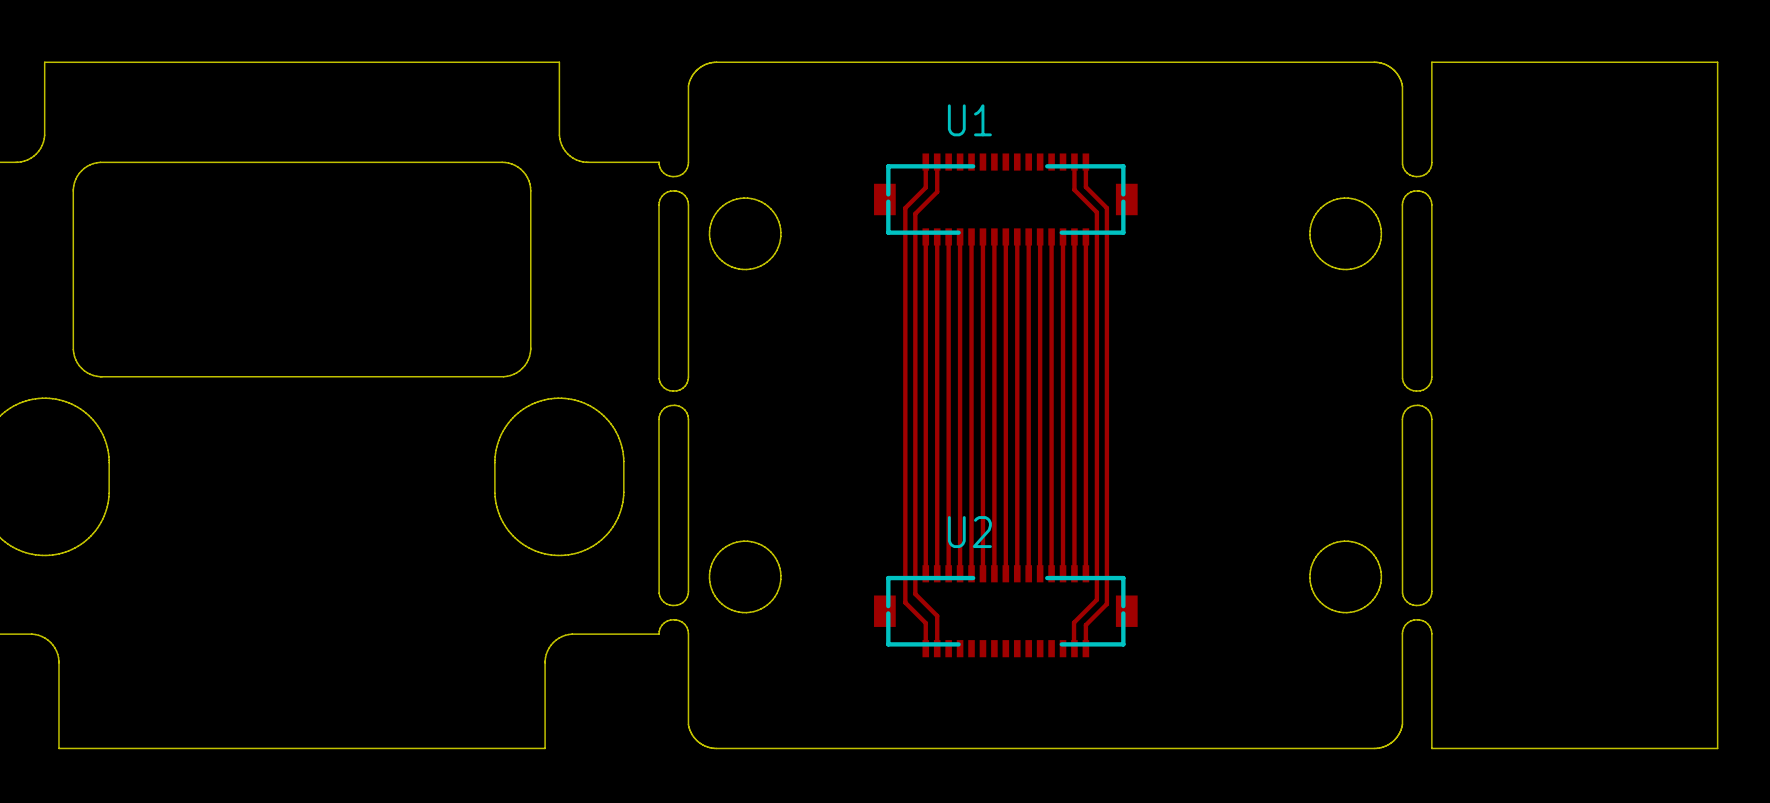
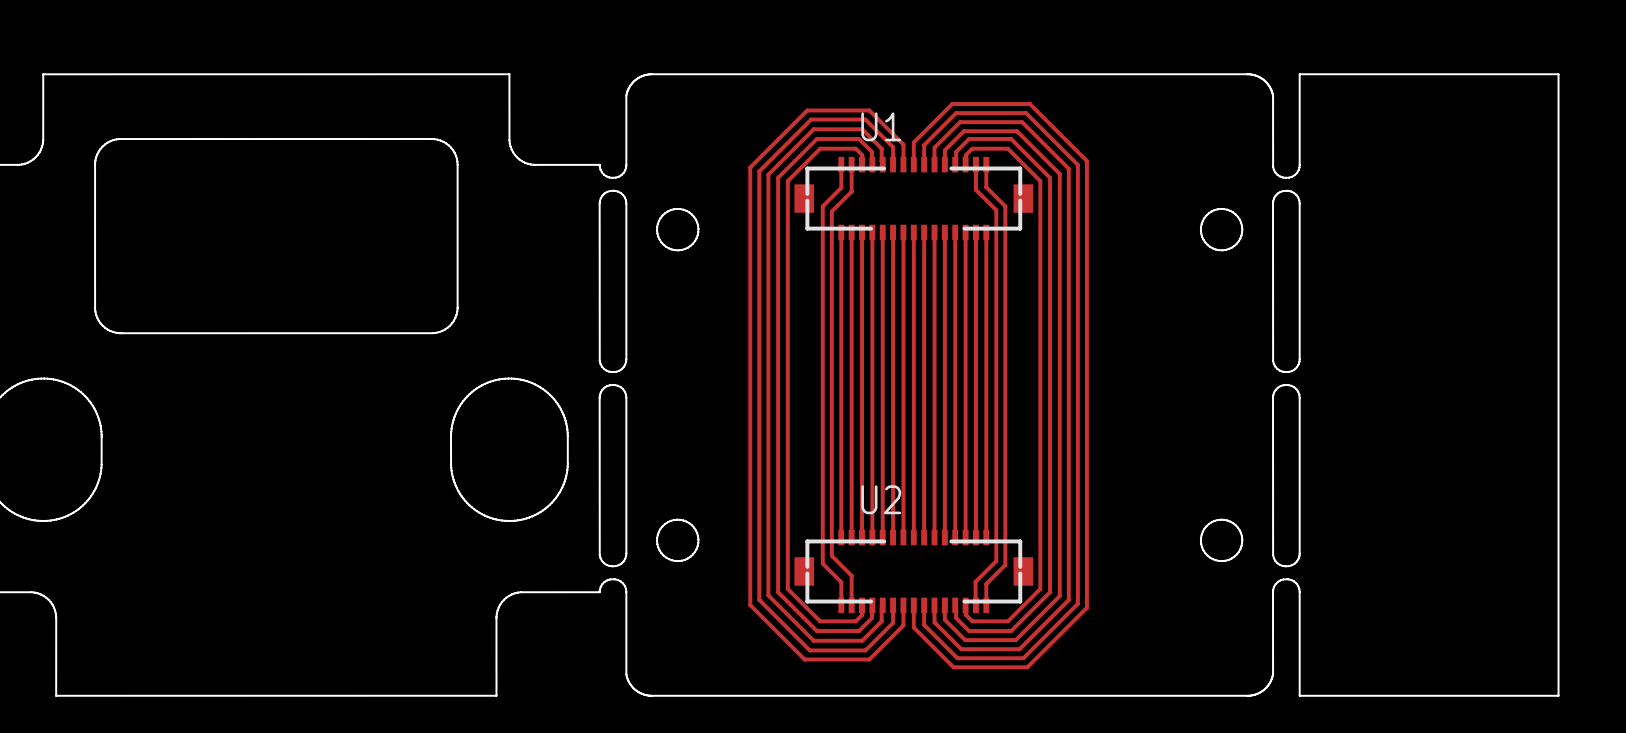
board edge: (100, 162) (90, 164) (81, 170) (75, 179) (73, 189) (73, 349) (77, 362) (90, 374) (101, 376) (503, 376) (516, 372) (528, 359) (530, 348) (530, 187) (525, 174) (515, 165) (502, 162) (100, 162) -> (119, 139) (110, 141) (102, 146) (97, 154) (95, 163) (95, 308) (98, 320) (107, 329) (120, 333) (433, 333) (445, 329) (453, 320) (457, 307) (457, 164) (454, 152) (443, 141) (431, 138) (119, 139)
track: none -> (862, 164) (862, 155) (855, 148) (820, 148) (787, 181) (787, 588) (820, 621) (855, 621) (862, 614) (862, 605)
track: none -> (872, 164) (871, 151) (859, 138) (816, 138) (778, 177) (778, 592) (816, 631) (859, 631) (871, 618) (872, 605)
track: none -> (882, 164) (881, 148) (862, 129) (813, 129) (768, 174) (768, 595) (813, 640) (862, 640) (881, 621) (882, 605)
track: none -> (893, 164) (893, 147) (865, 119) (811, 119) (759, 171) (759, 599) (809, 650) (865, 650) (893, 622) (893, 605)
track: none -> (903, 164) (903, 144) (869, 110) (807, 110) (750, 167) (750, 605) (804, 659) (869, 659) (903, 625) (903, 605)
track: none -> (913, 164) (913, 142) (952, 104) (1029, 104) (1086, 161) (1086, 607) (1027, 667) (953, 667) (913, 627) (913, 605)
track: none -> (924, 164) (924, 145) (956, 113) (1026, 113) (1077, 164) (1077, 603) (1023, 658) (957, 658) (924, 624) (924, 605)
track: none -> (934, 164) (934, 147) (960, 122) (1022, 122) (1068, 168) (1068, 599) (1019, 649) (961, 649) (934, 622) (934, 605)
track: none -> (944, 164) (944, 150) (963, 131) (1017, 131) (1059, 173) (1059, 596) (1015, 640) (965, 640) (944, 619) (944, 605)
track: none -> (955, 164) (956, 151) (969, 138) (1011, 138) (1050, 177) (1050, 592) (1011, 631) (969, 631) (956, 618) (955, 605)
track: none -> (965, 164) (965, 155) (972, 148) (1007, 148) (1040, 181) (1040, 588) (1007, 621) (972, 621) (965, 614) (965, 605)
board edge: (743, 198) (729, 201) (717, 210) (712, 220) (709, 235) (713, 249) (722, 261) (735, 268) (746, 269) (760, 265) (772, 256) (779, 243) (780, 232) (777, 218) (768, 206) (755, 199) (743, 198) -> none
board edge: (1344, 198) (1329, 201) (1318, 210) (1312, 220) (1309, 235) (1313, 249) (1322, 261) (1335, 268) (1346, 269) (1361, 265) (1373, 256) (1380, 243) (1381, 232) (1377, 218) (1368, 206) (1355, 199) (1344, 198) -> none
board edge: none -> (677, 208) (667, 211) (662, 215) (657, 223) (657, 230) (659, 239) (663, 244) (672, 249) (678, 250) (684, 249) (692, 243) (696, 238) (698, 228) (697, 222) (691, 214) (683, 209) (677, 208)
board edge: none -> (1220, 208) (1211, 211) (1206, 215) (1202, 220) (1200, 230) (1202, 236) (1207, 244) (1215, 249) (1222, 250) (1228, 249) (1236, 243) (1241, 235) (1242, 228) (1239, 219) (1235, 214) (1227, 209) (1220, 208)
board edge: (743, 541) (729, 544) (717, 553) (710, 567) (709, 578) (713, 592) (722, 604) (735, 611) (746, 612) (760, 609) (772, 599) (779, 586) (780, 575) (777, 561) (768, 549) (755, 542) (743, 541) -> none
board edge: (1344, 541) (1329, 544) (1318, 553) (1311, 567) (1309, 578) (1313, 592) (1322, 604) (1335, 611) (1346, 612) (1361, 609) (1373, 599) (1380, 586) (1381, 575) (1377, 561) (1368, 549) (1355, 542) (1344, 541) -> none
board edge: none -> (677, 519) (670, 520) (662, 526) (657, 534) (657, 541) (659, 550) (663, 555) (672, 560) (678, 561) (687, 558) (692, 554) (696, 549) (698, 539) (697, 533) (691, 525) (686, 521) (677, 519)
board edge: none -> (1220, 519) (1214, 520) (1206, 526) (1202, 531) (1200, 541) (1202, 547) (1207, 555) (1215, 560) (1222, 561) (1231, 558) (1236, 554) (1241, 546) (1242, 539) (1239, 530) (1235, 525) (1230, 521) (1220, 519)

